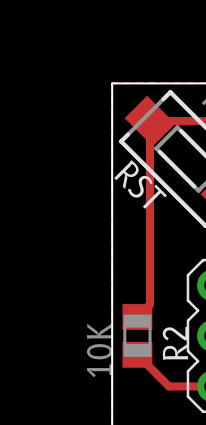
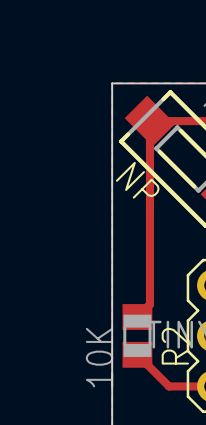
RST name: RST (140, 184) -> NP (137, 180)

